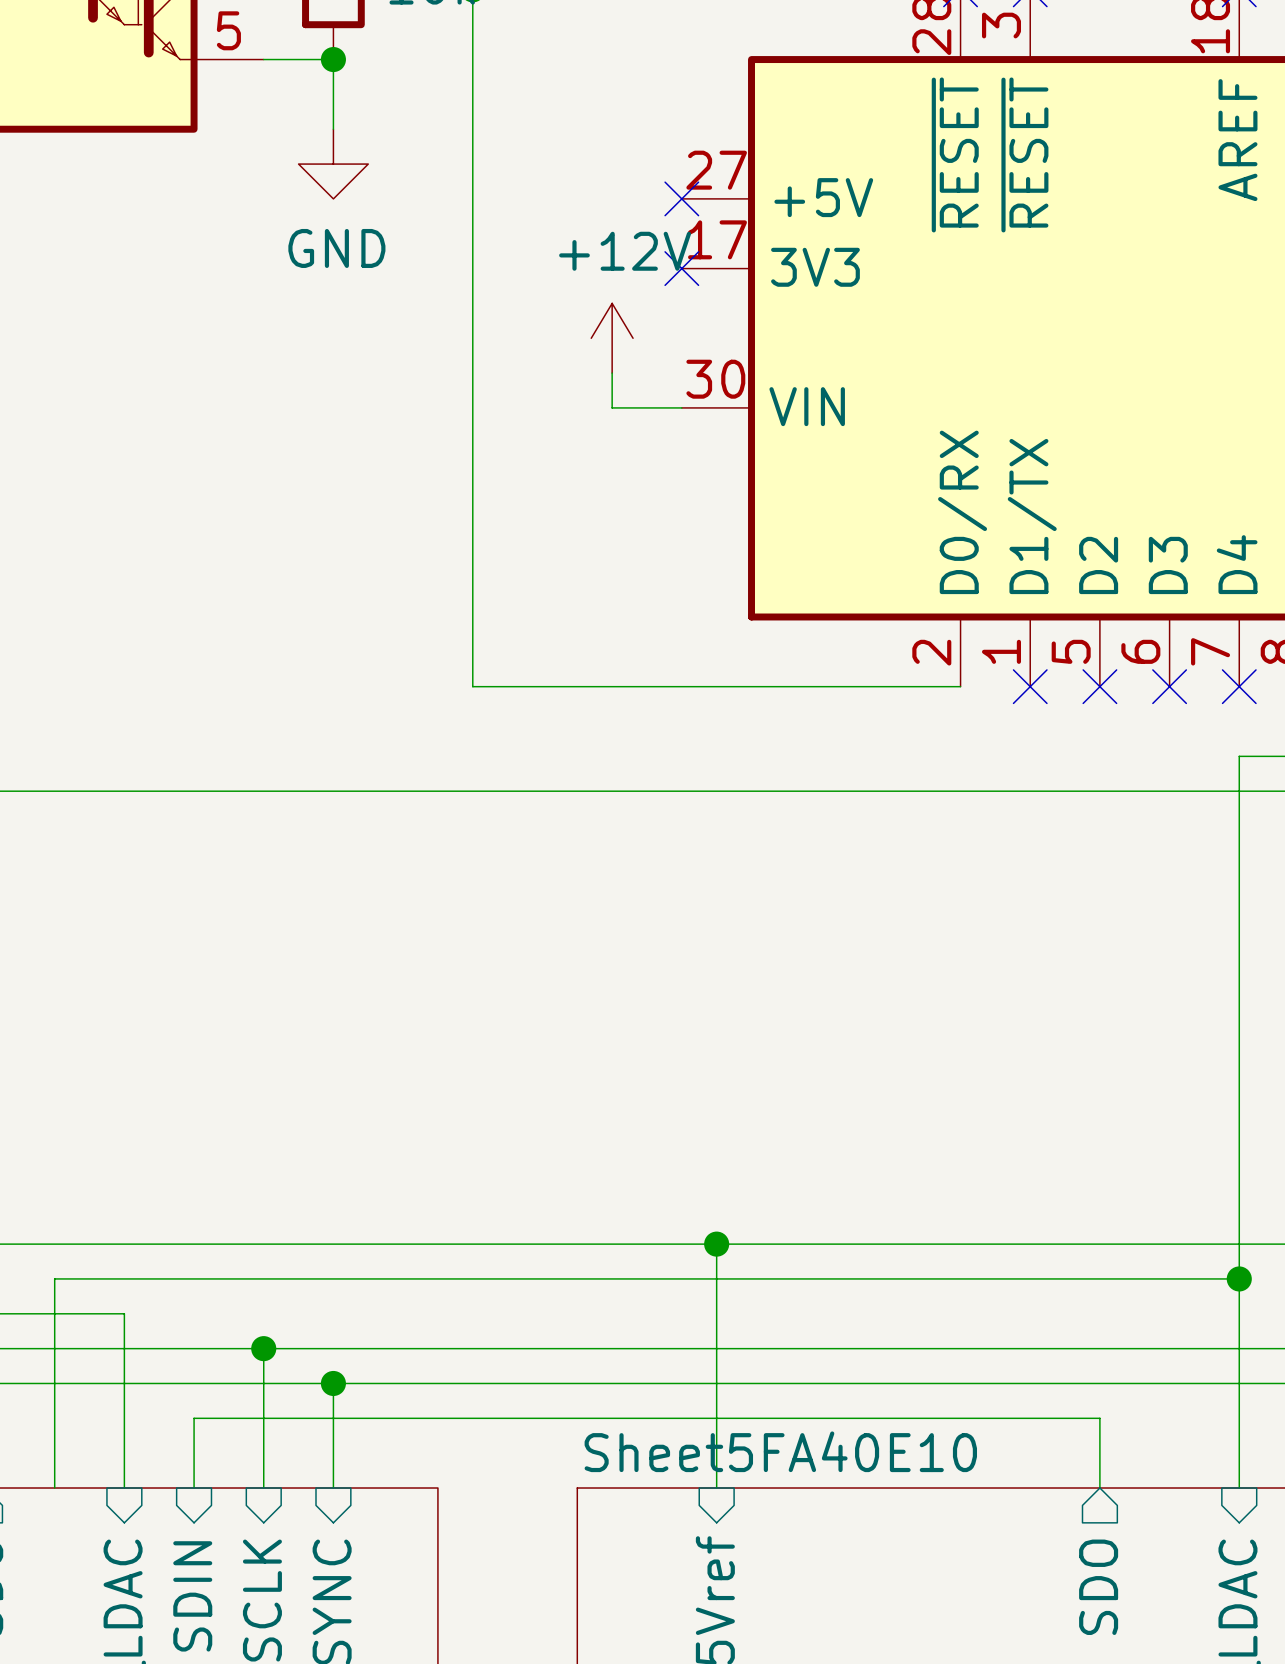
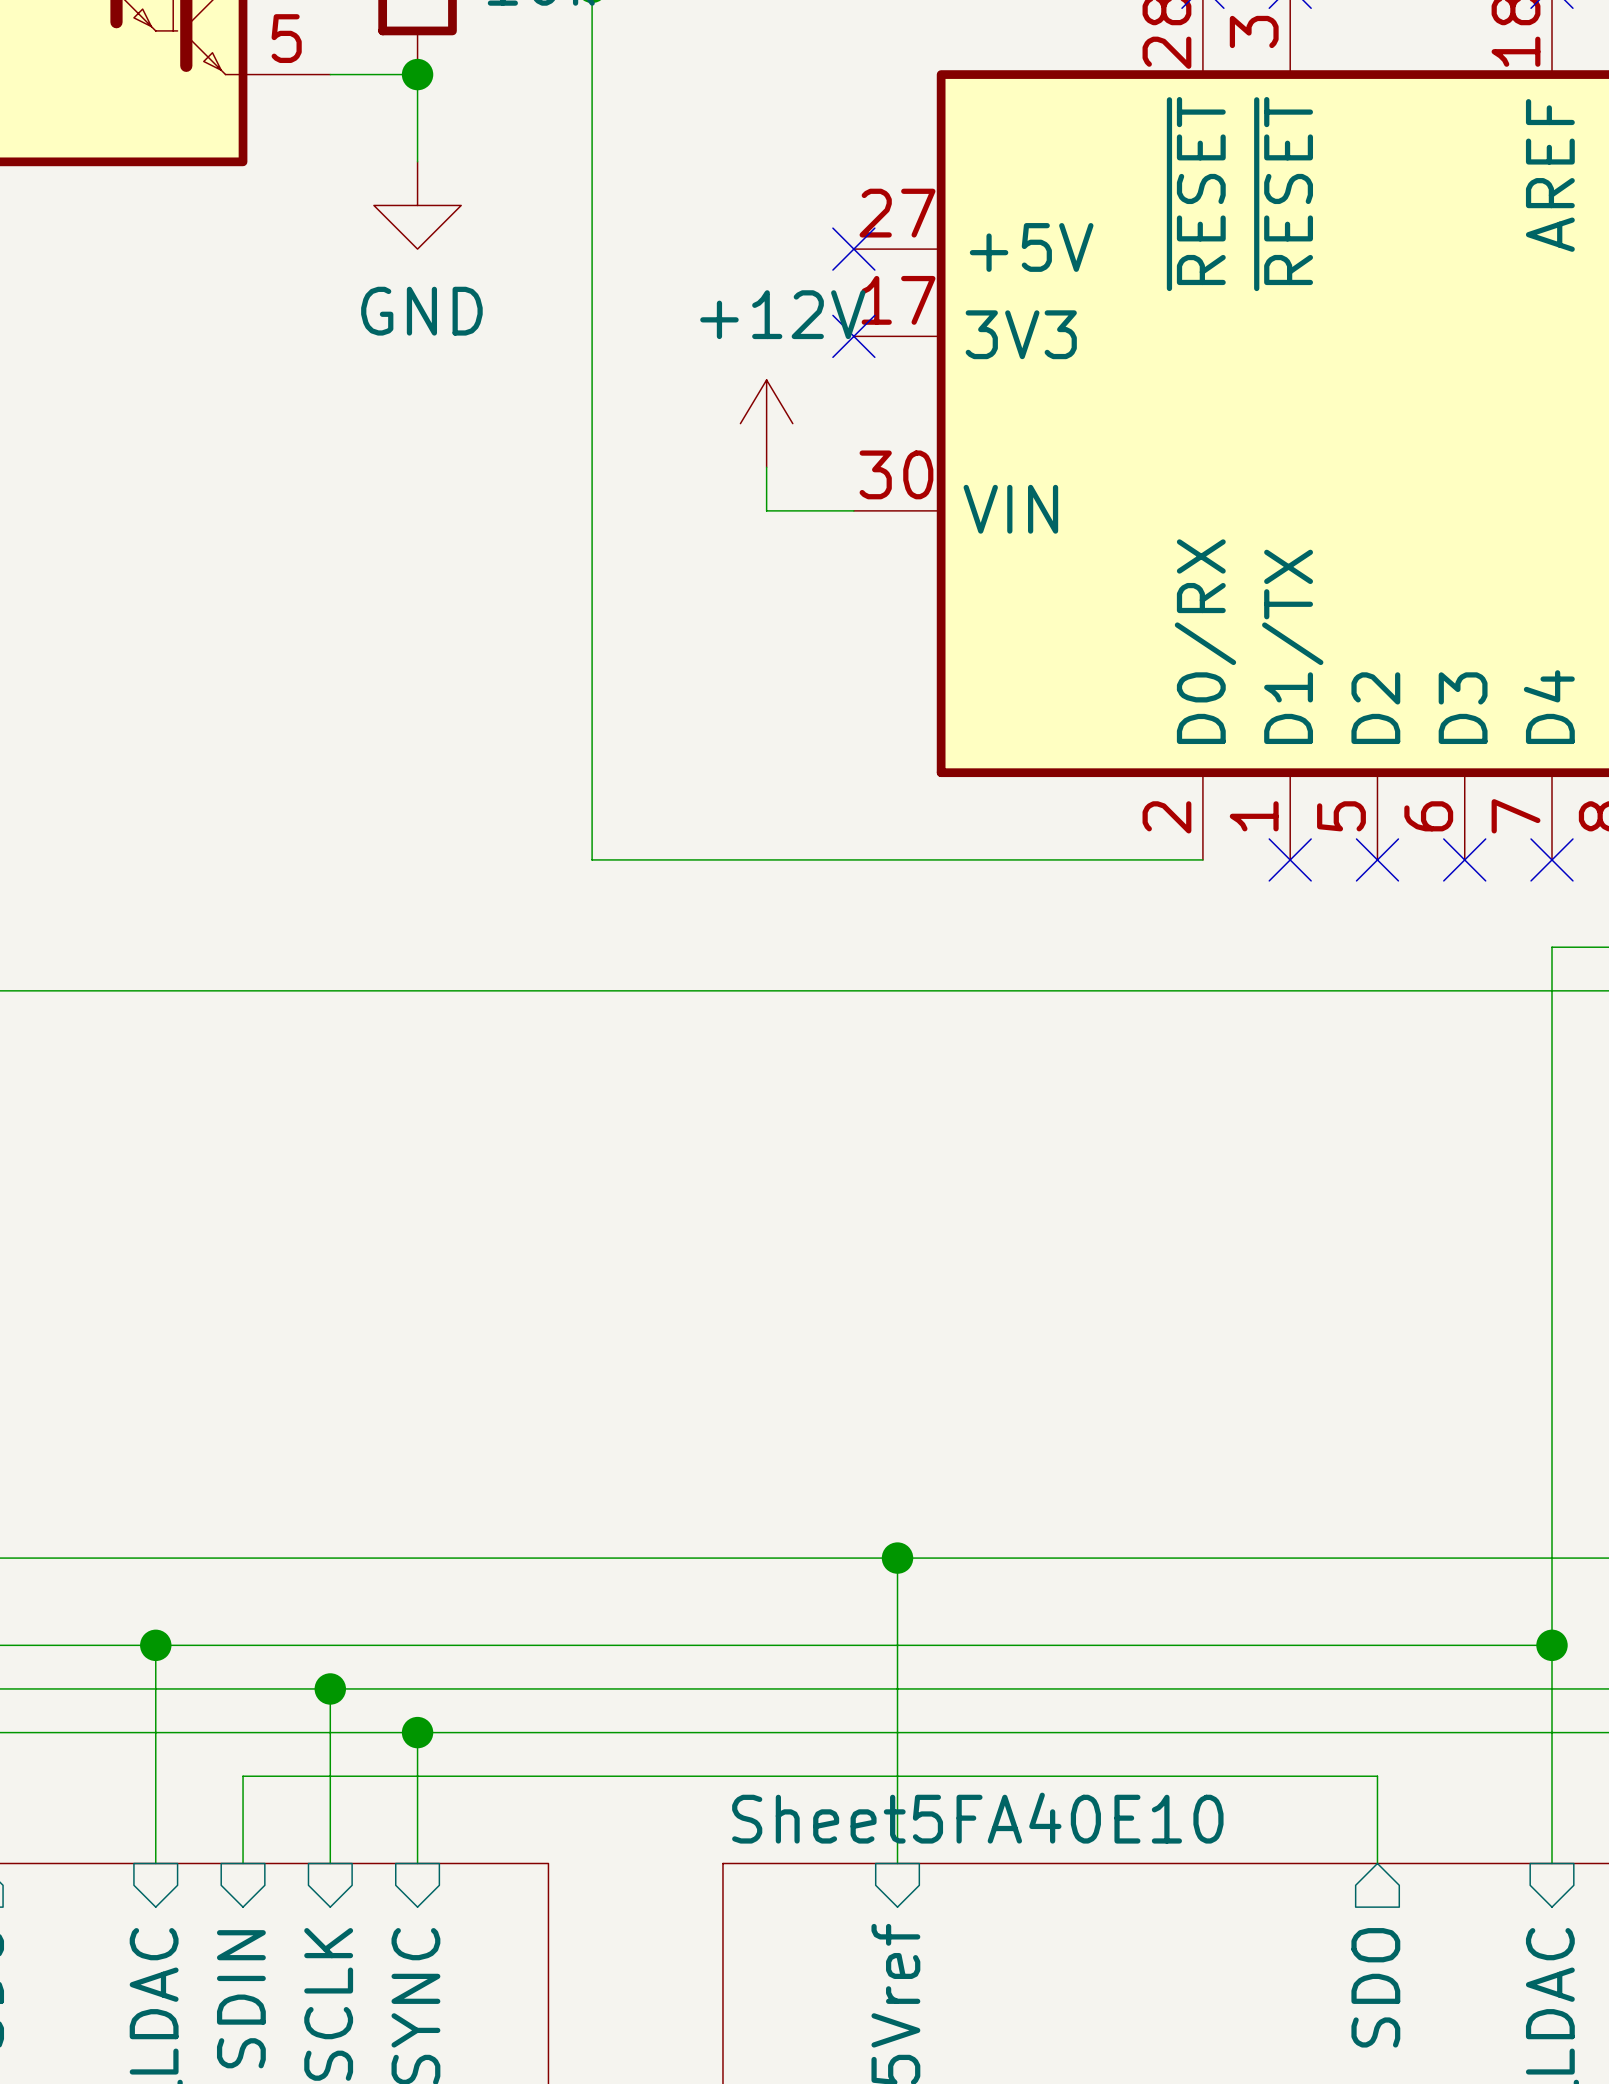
wire: (1239, 1278) (54, 1278) (54, 1488) -> none
junction position: (1239, 1278) -> (1552, 1645)
wire: none -> (155, 1645) (1552, 1645)
junction: none -> (155, 1645)

